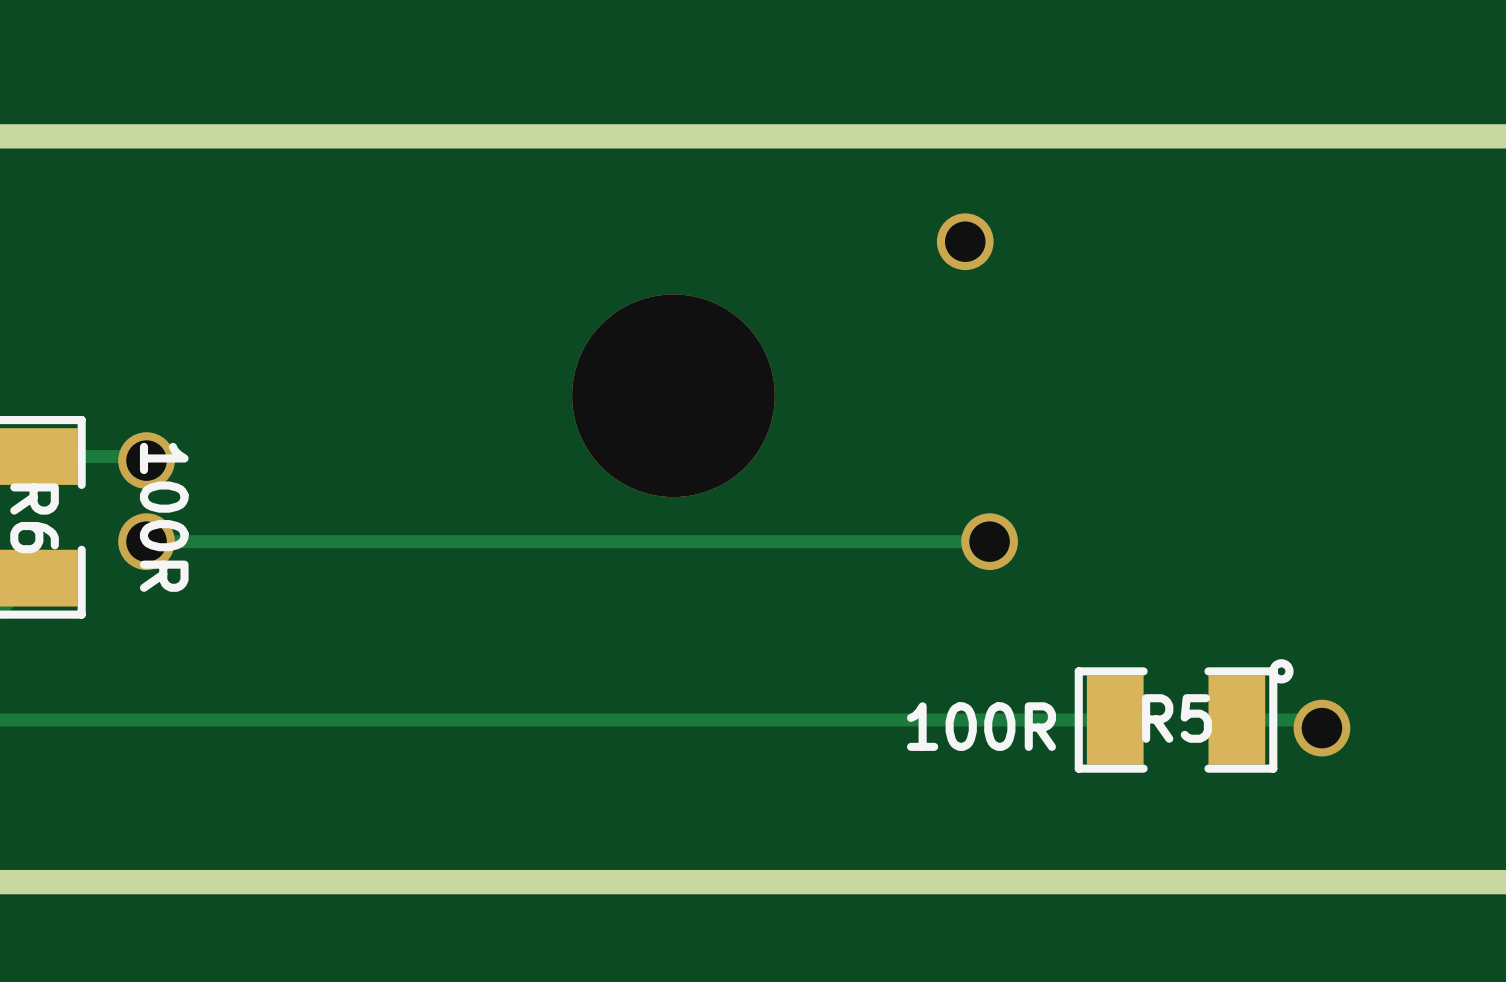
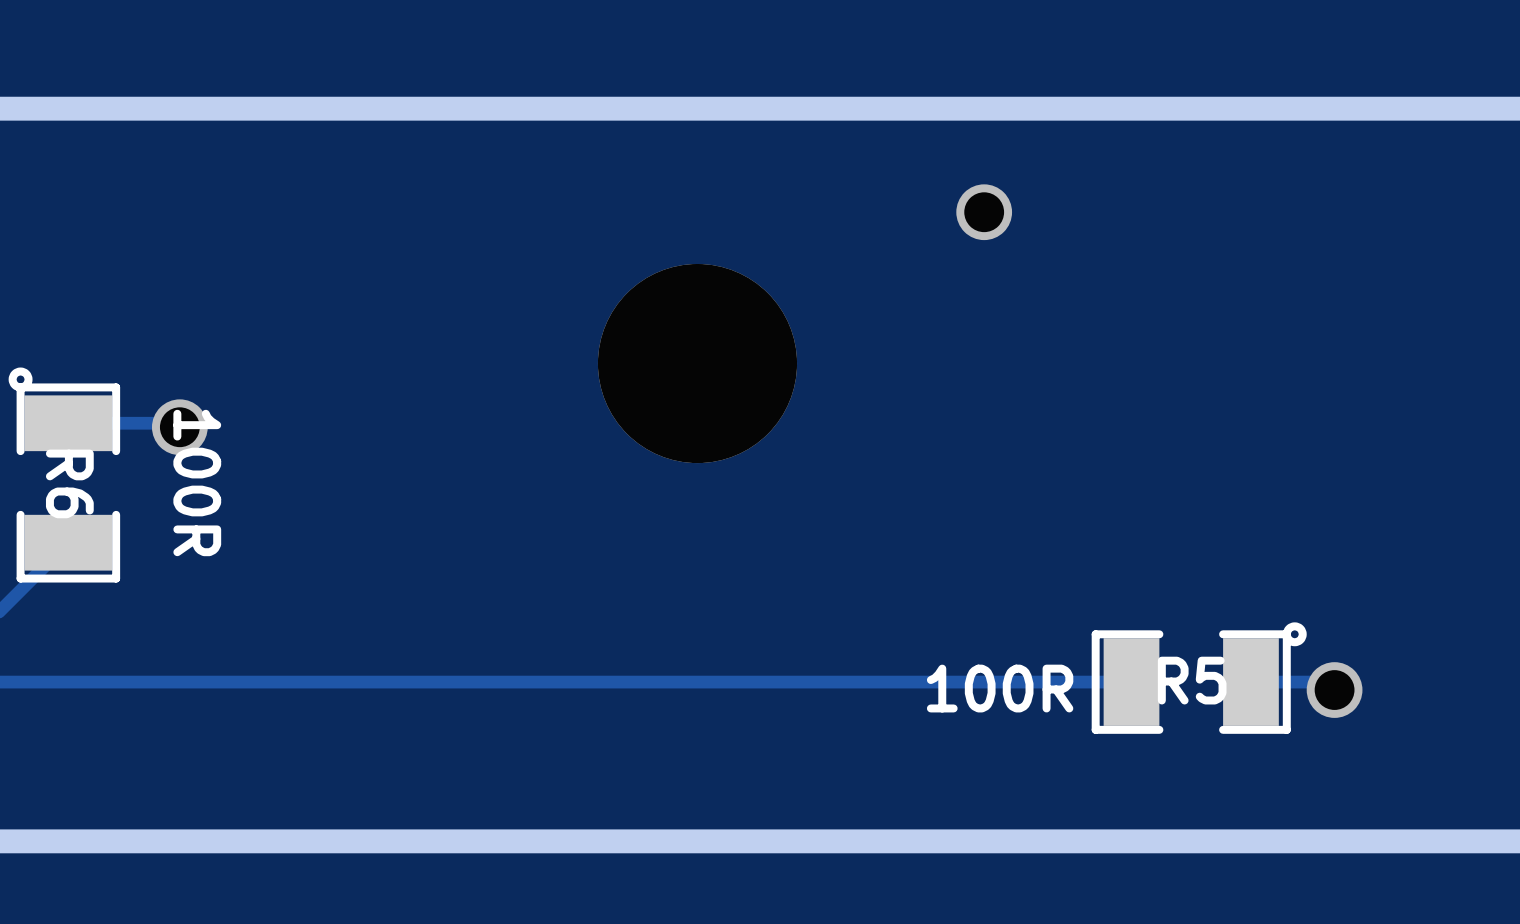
via: (146, 541) -> none
track: (989, 541) (146, 541) -> none
via: (989, 541) -> none

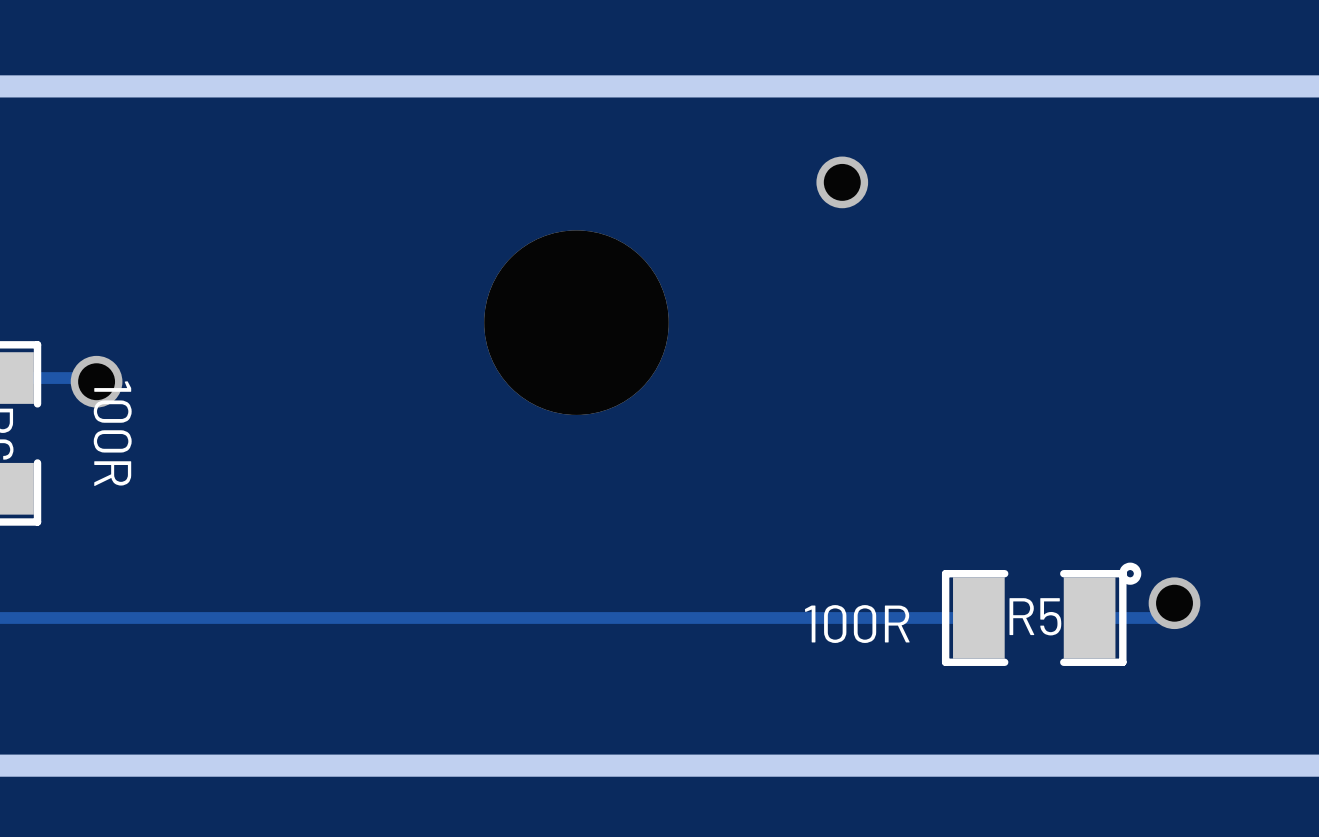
via position: (1334, 690) -> (1174, 603)

